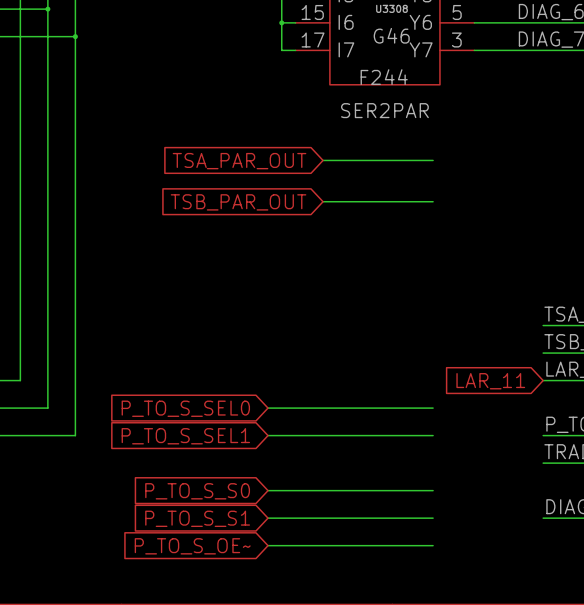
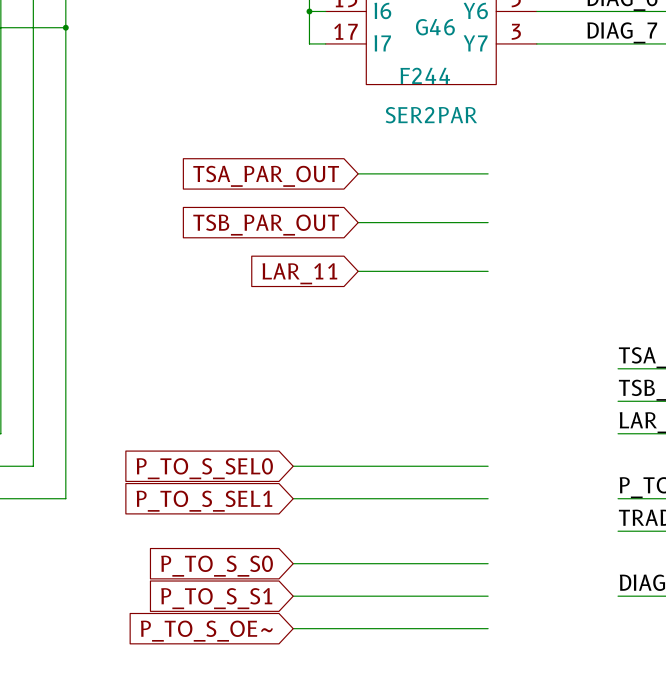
global label: none -> LAR_11 (299, 273)
wire: none -> (358, 271) (488, 271)
global label: LAR_11 (490, 381) -> none

